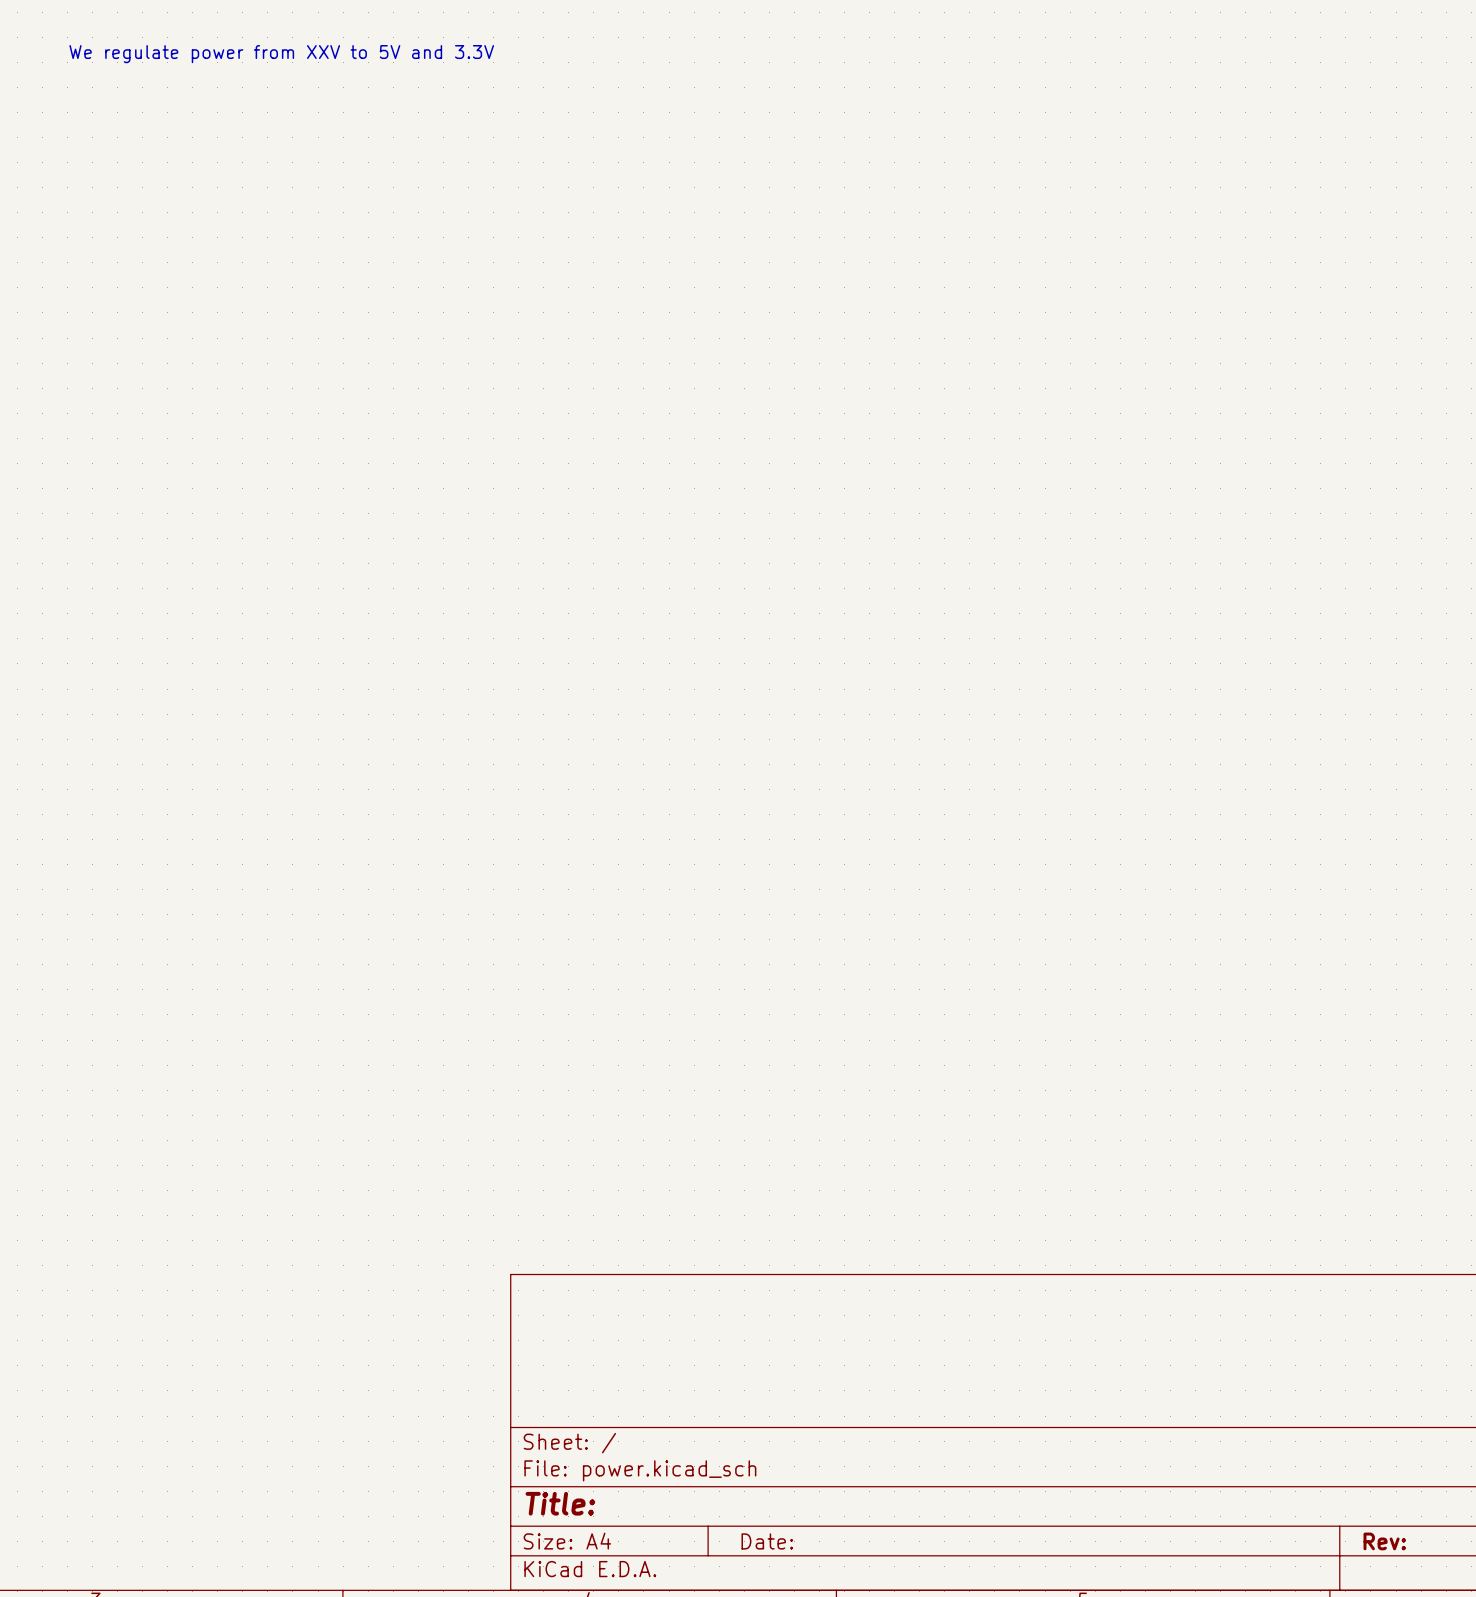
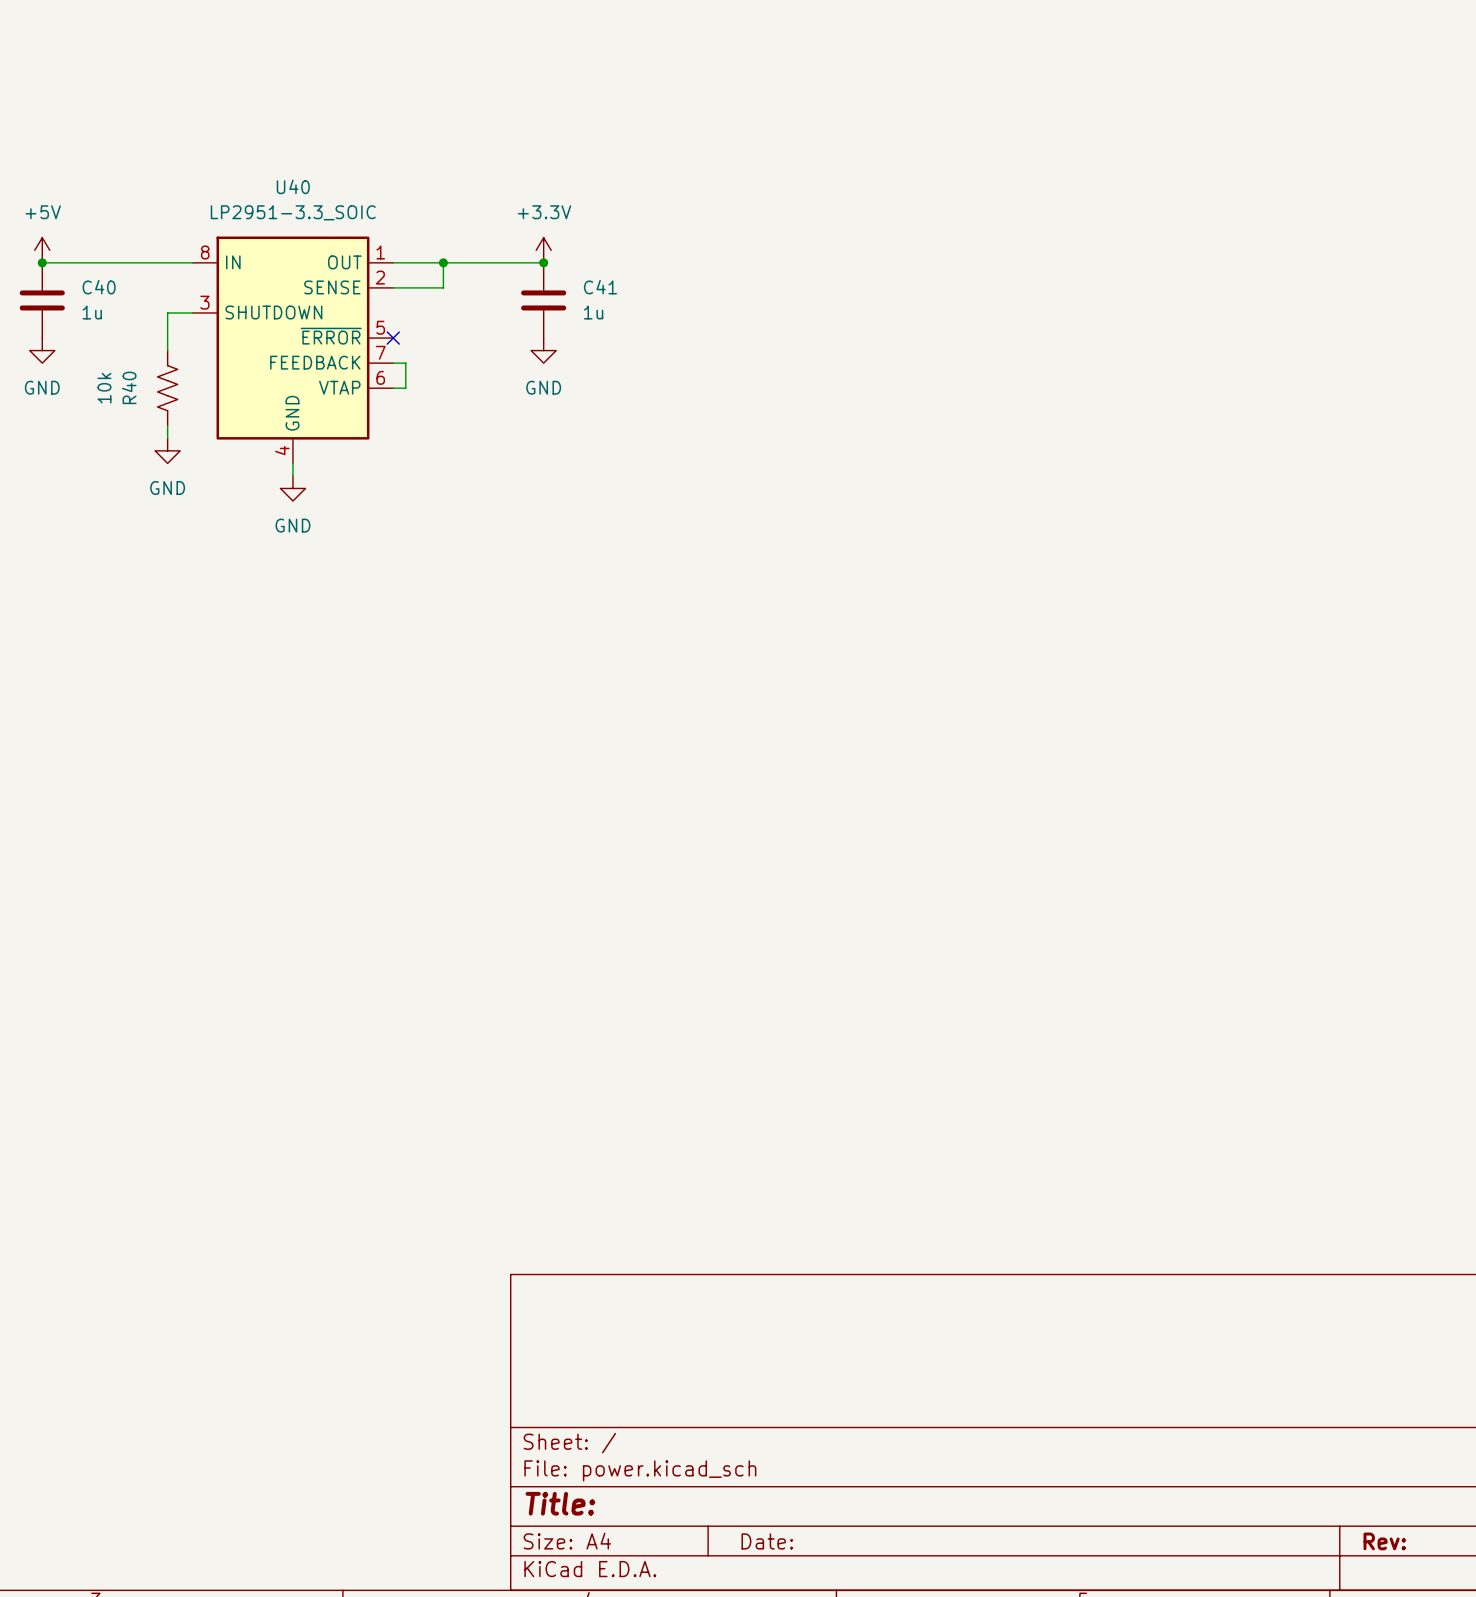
text: We regulate power from XXV to 5V and 3.3V (281, 54) -> none
power symbol: none -> +5V (42, 250)
power symbol: none -> +3.3V (543, 250)
wire: none -> (42, 262) (192, 262)
junction: none -> (42, 262)
wire: none -> (393, 262) (543, 262)
wire: none -> (443, 262) (443, 287) (393, 287)
junction: none -> (443, 262)
junction: none -> (543, 262)
C40: none -> 1u (42, 300)
C41: none -> 1u (543, 300)
wire: none -> (192, 312) (167, 312) (167, 350)
no-connect mark: none -> (393, 338)
U40: none -> LP2951-3.3_SOIC (292, 349)
power symbol: none -> GND (42, 350)
power symbol: none -> GND (543, 350)
wire: none -> (393, 363) (405, 363) (405, 388) (393, 388)
R40: none -> 10k (167, 388)
wire: none -> (167, 425) (167, 438)
power symbol: none -> GND (167, 450)
wire: none -> (292, 463) (292, 475)
power symbol: none -> GND (292, 488)

